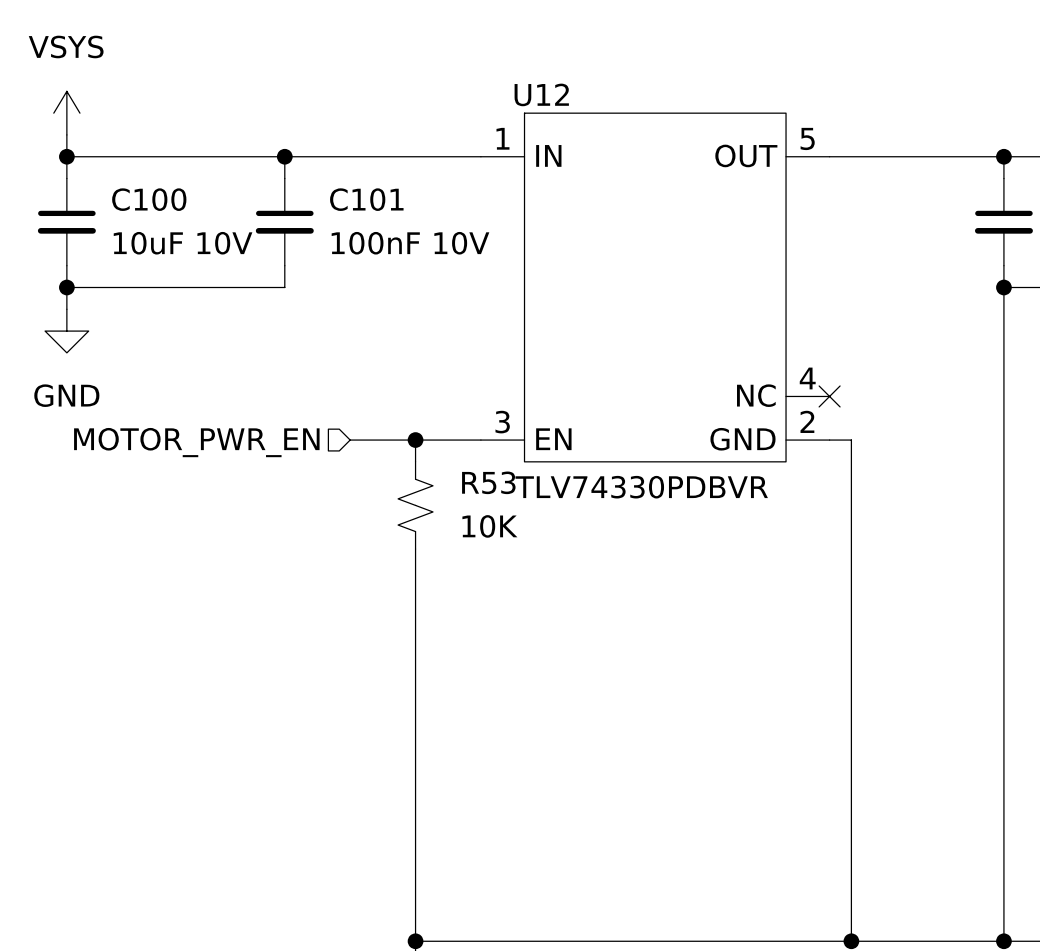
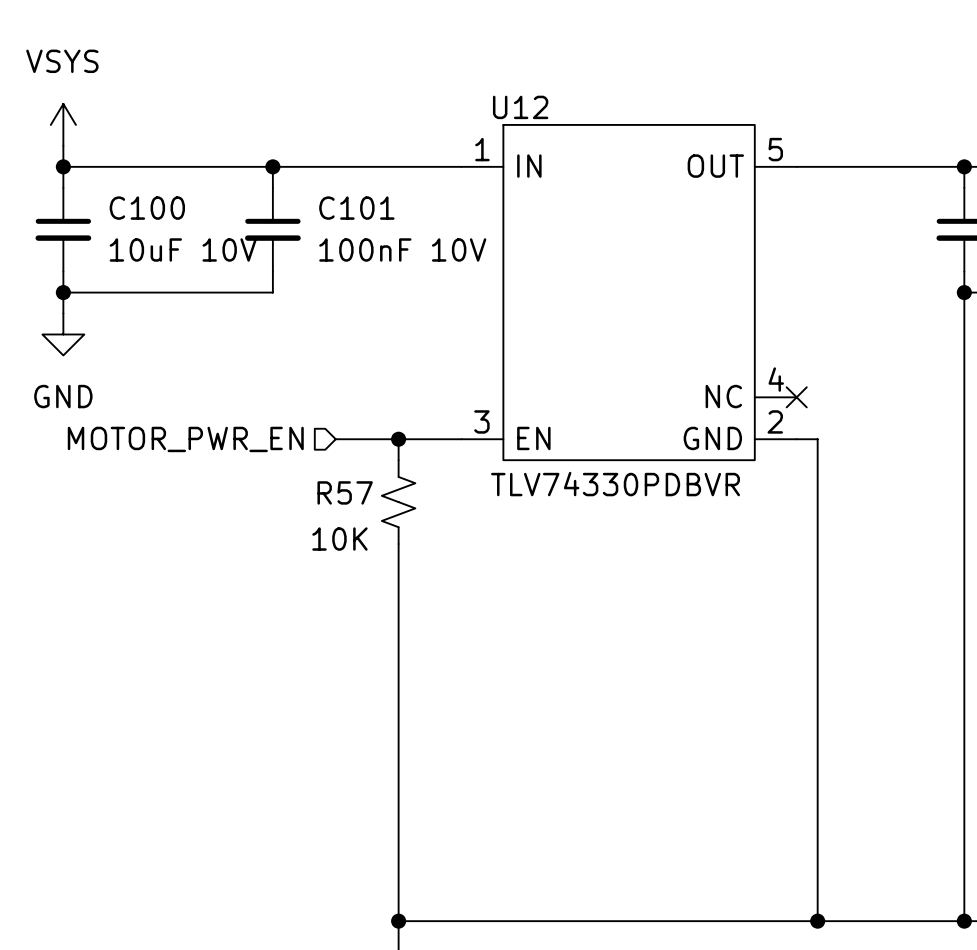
R53 name: R53 (488, 482) -> R57 (345, 492)
R53 value position: 10K (489, 526) -> 10K (339, 539)

